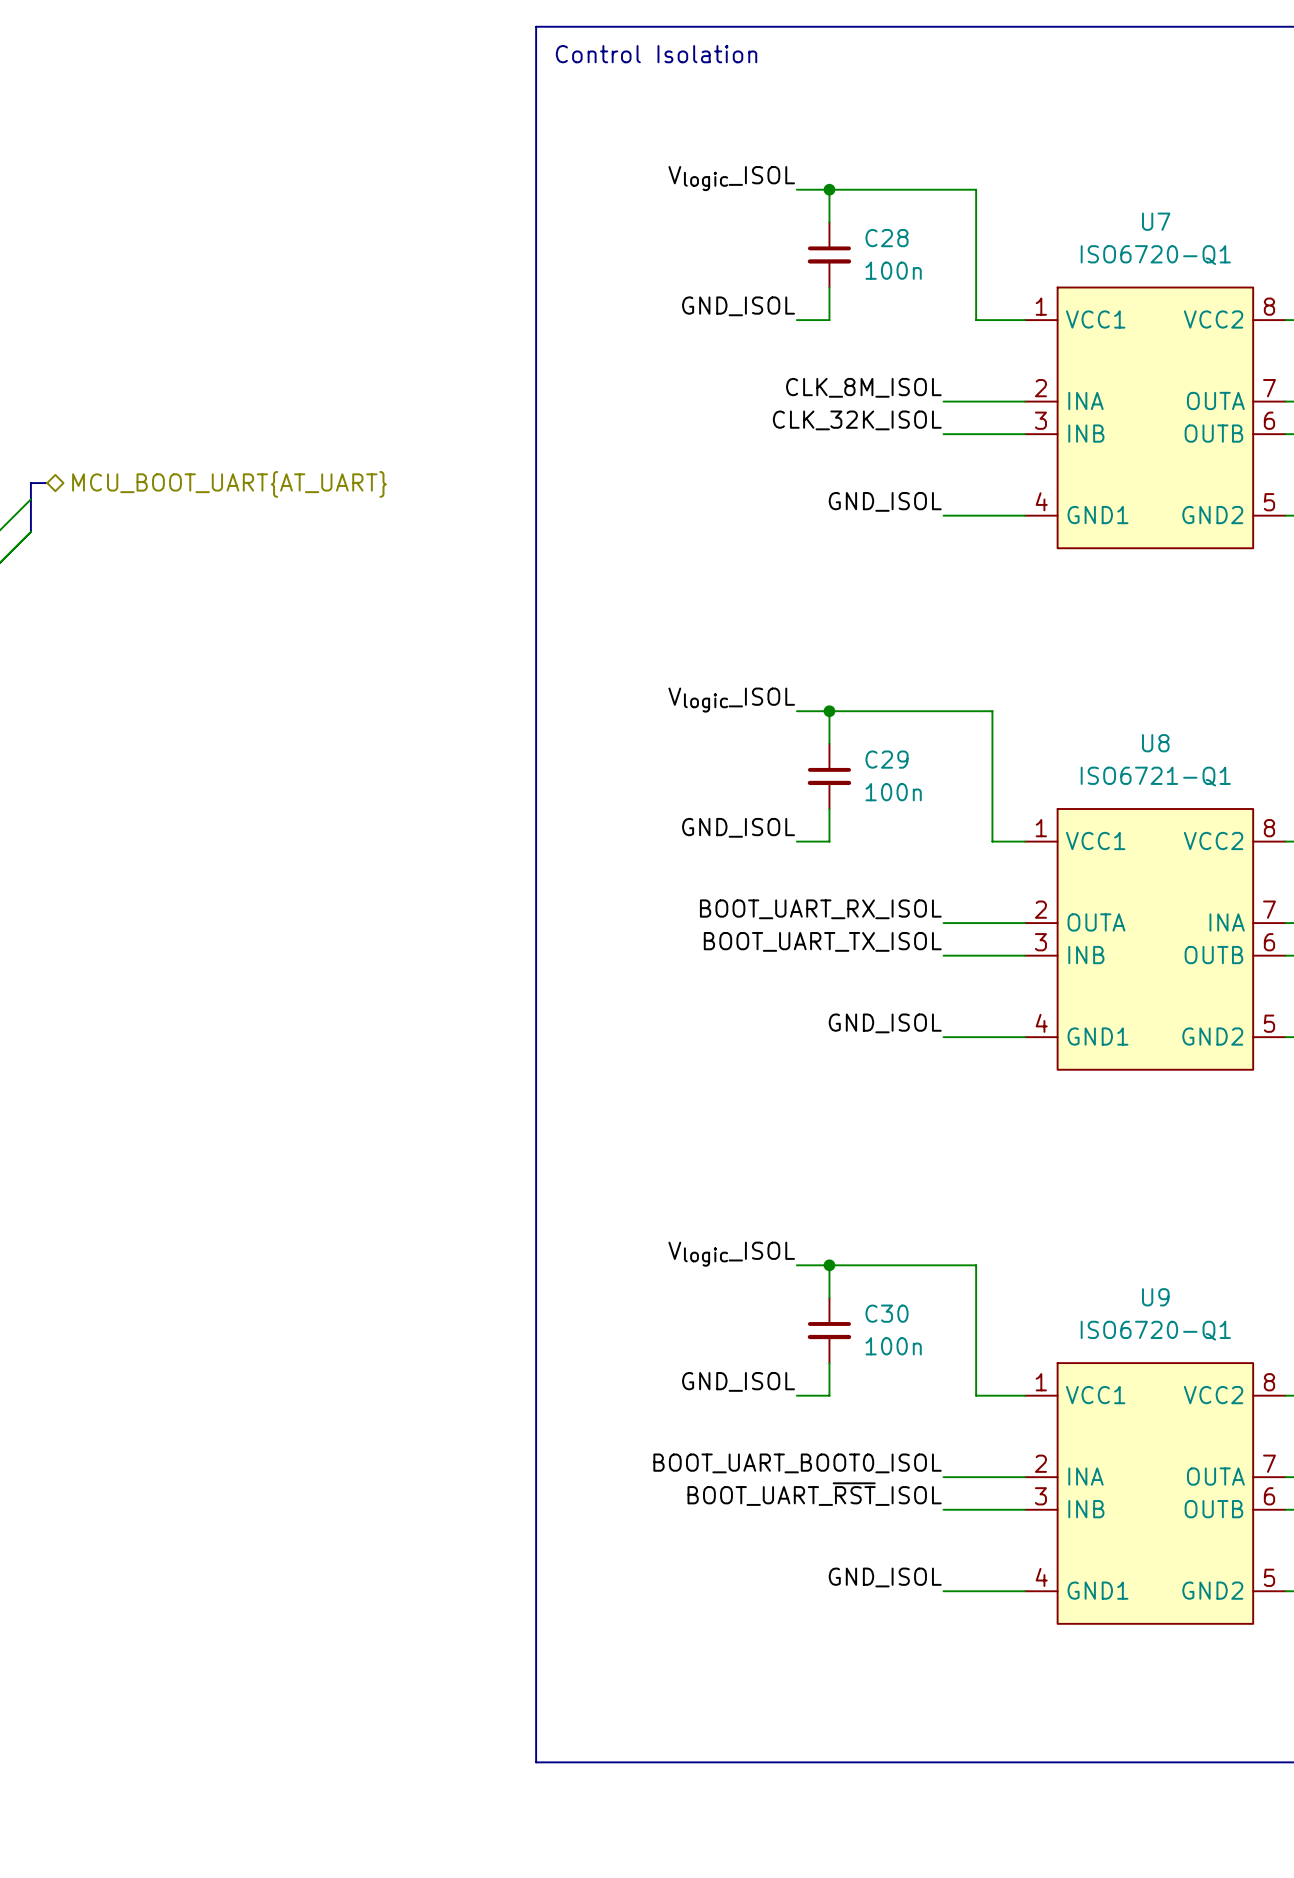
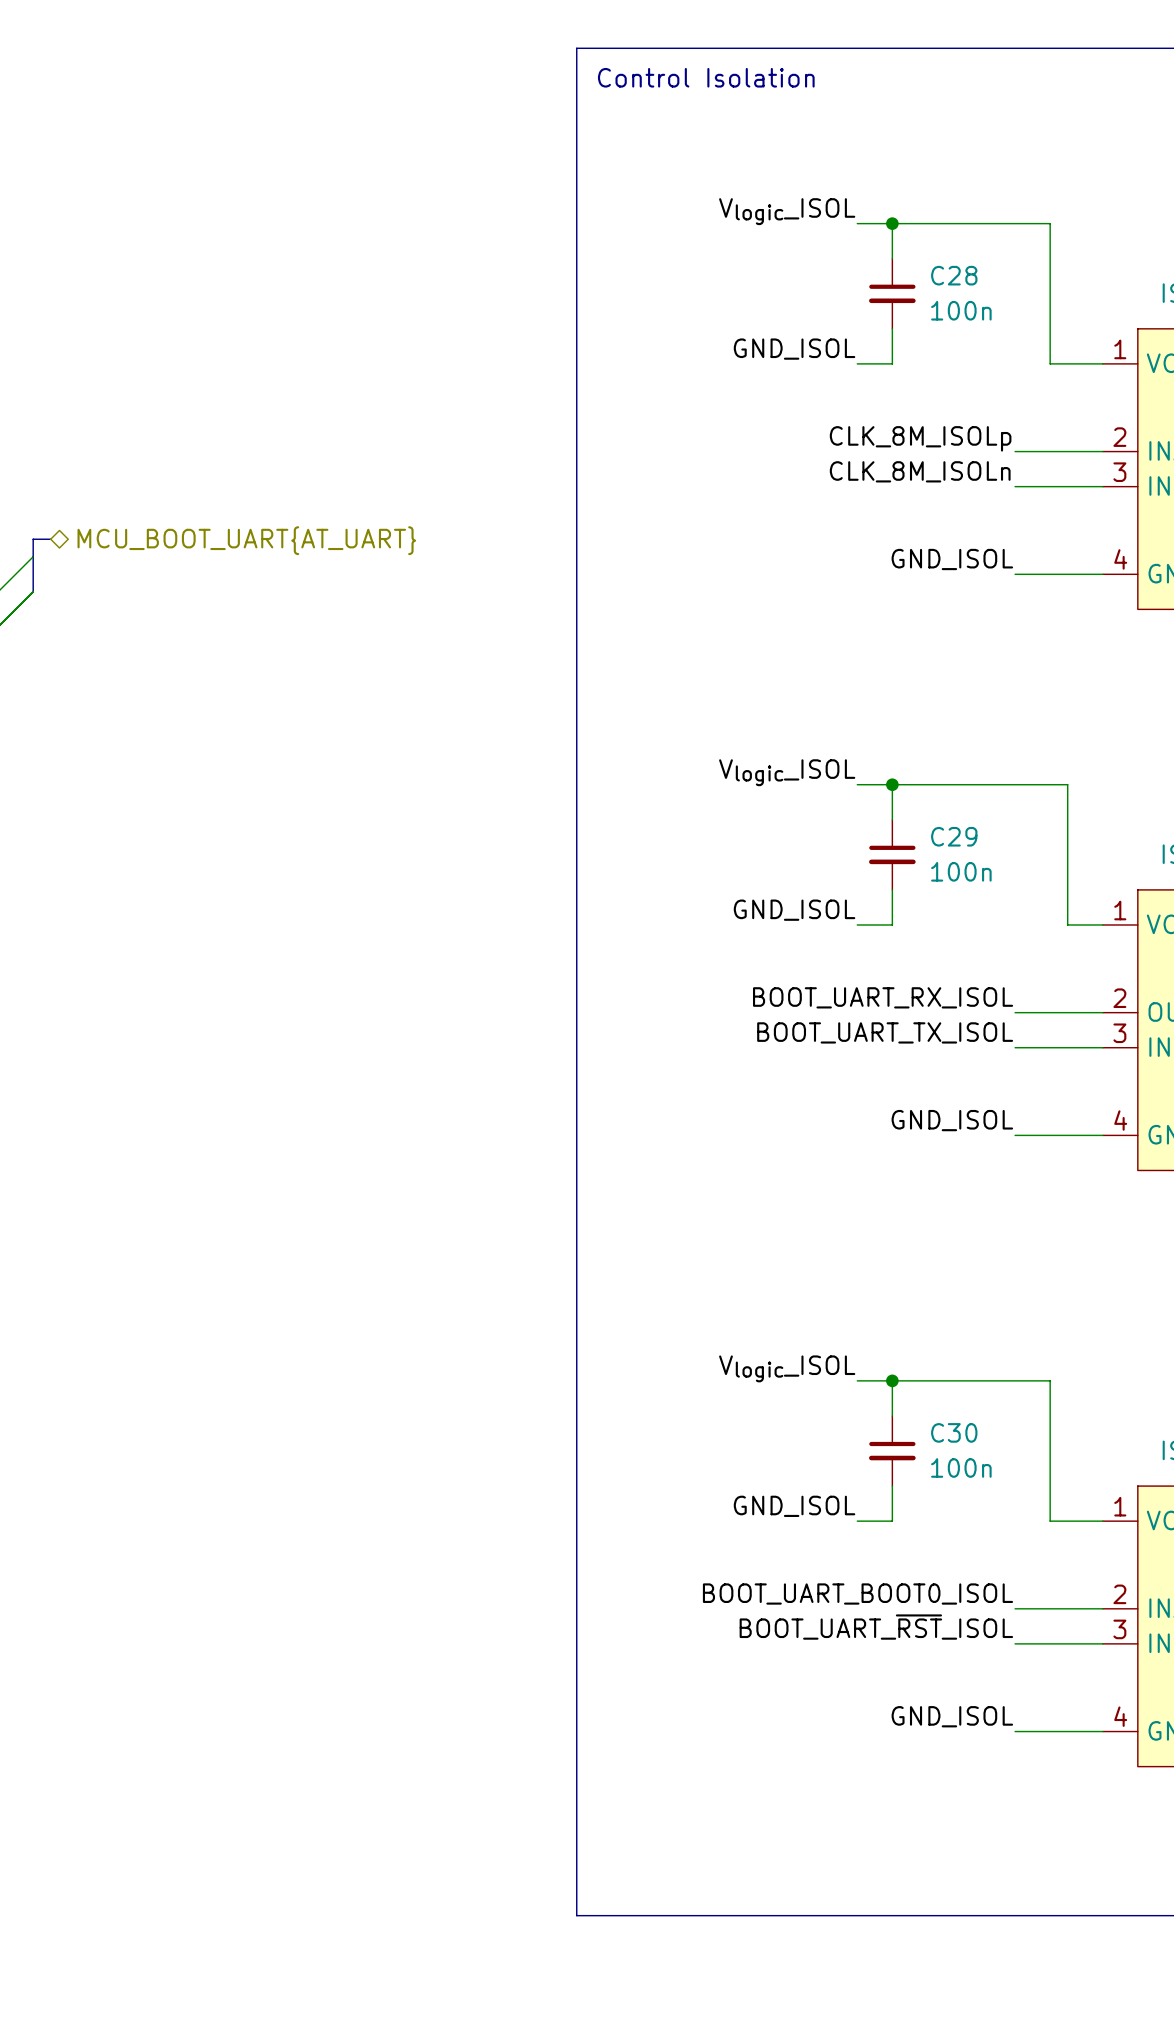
label: CLK_8M_ISOL (863, 387) -> CLK_8M_ISOLp (920, 438)
label: CLK_32K_ISOL (857, 420) -> CLK_8M_ISOLn (920, 471)

